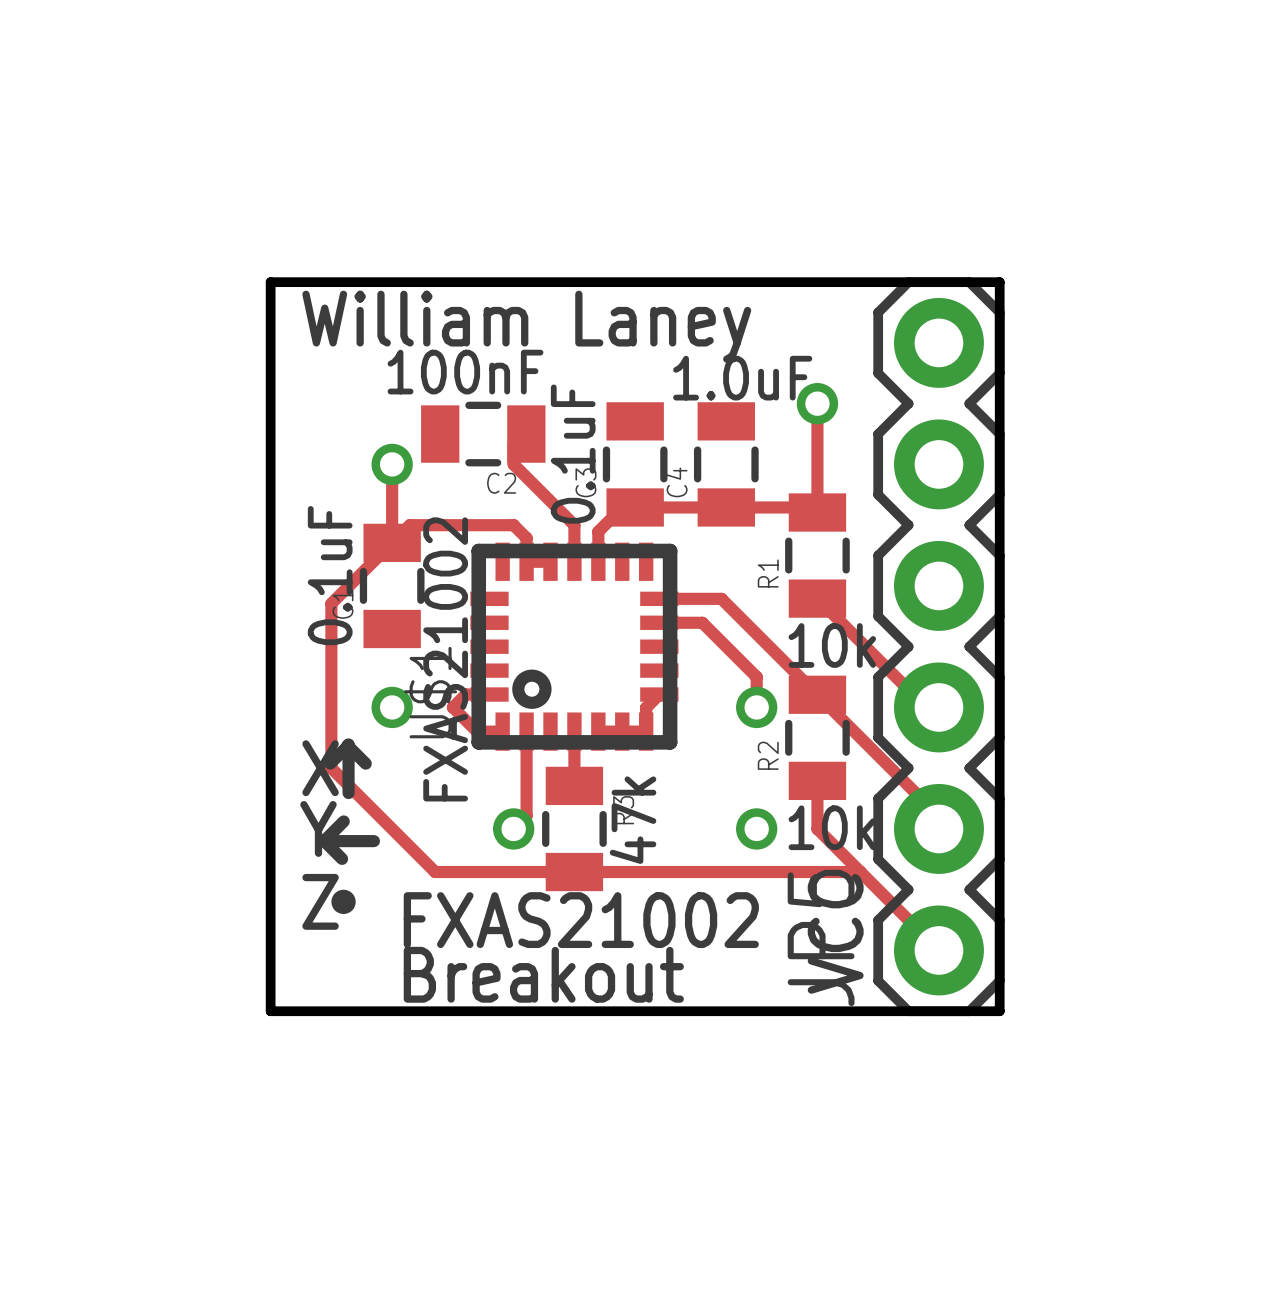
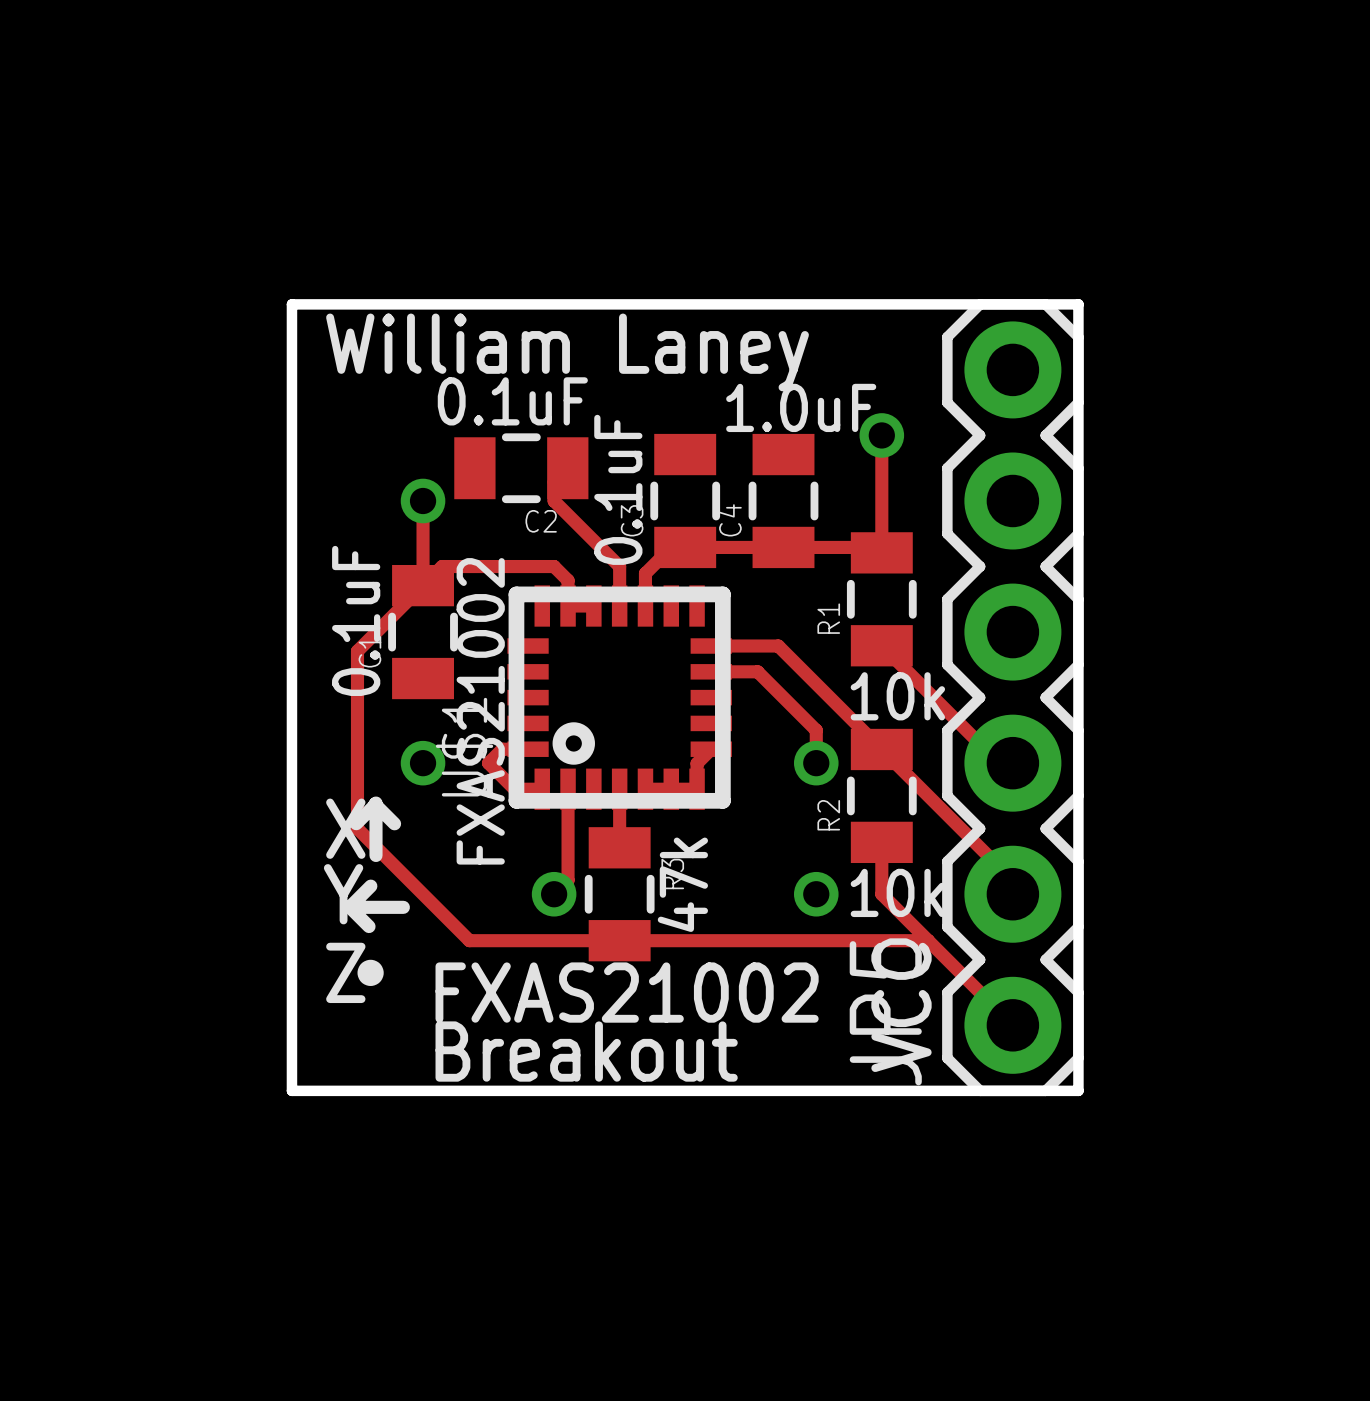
text: William Laney (526, 326) -> William (448, 343)
text: none -> Laney (713, 352)
text: 100nF (465, 372) -> 0.1uF (512, 401)

